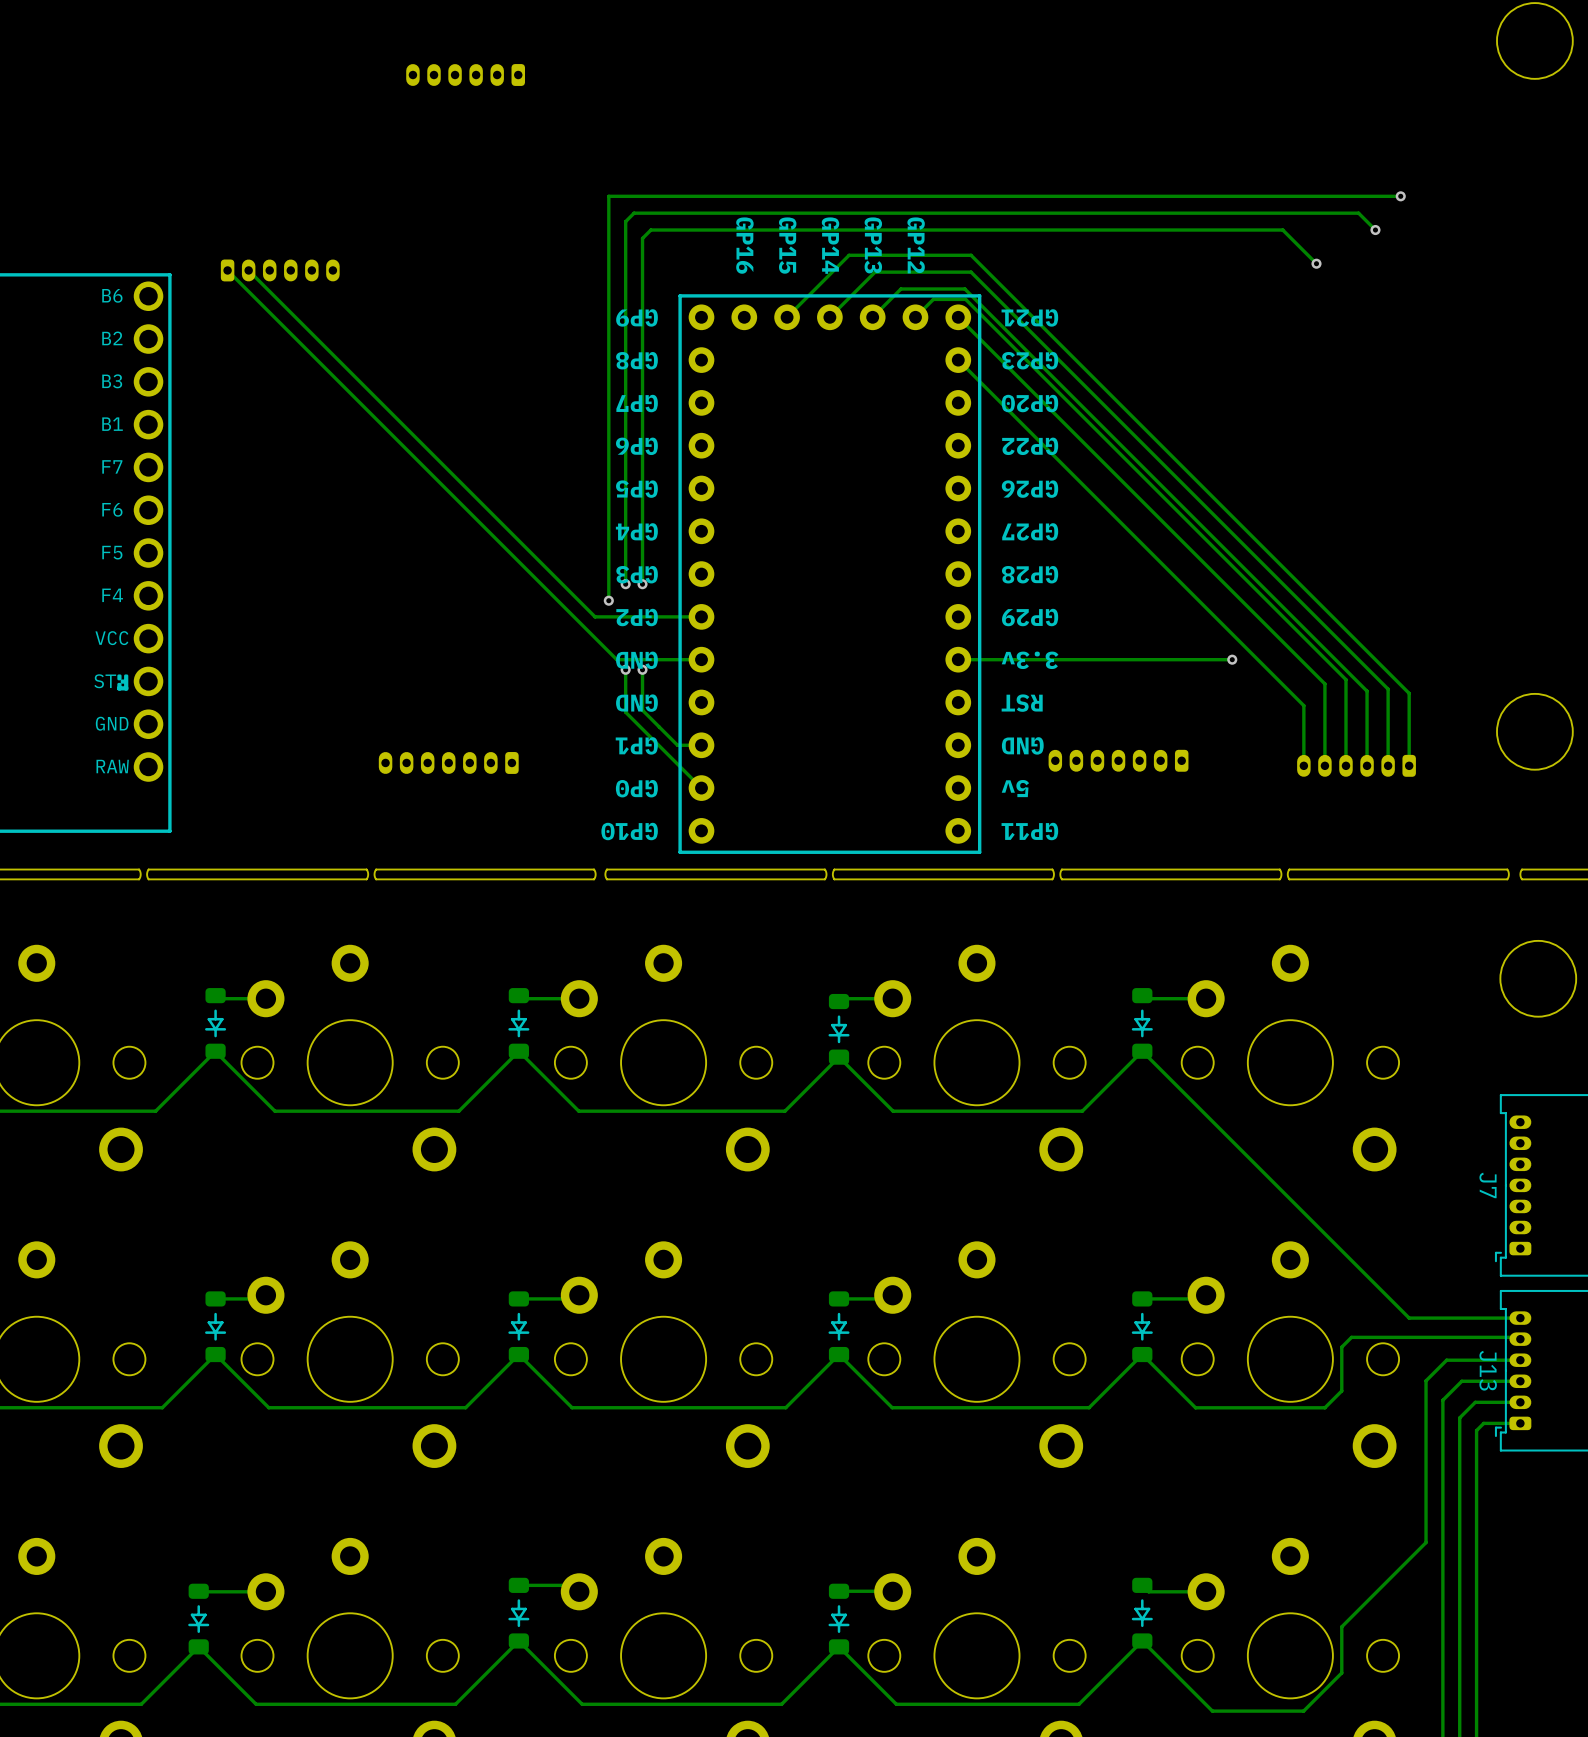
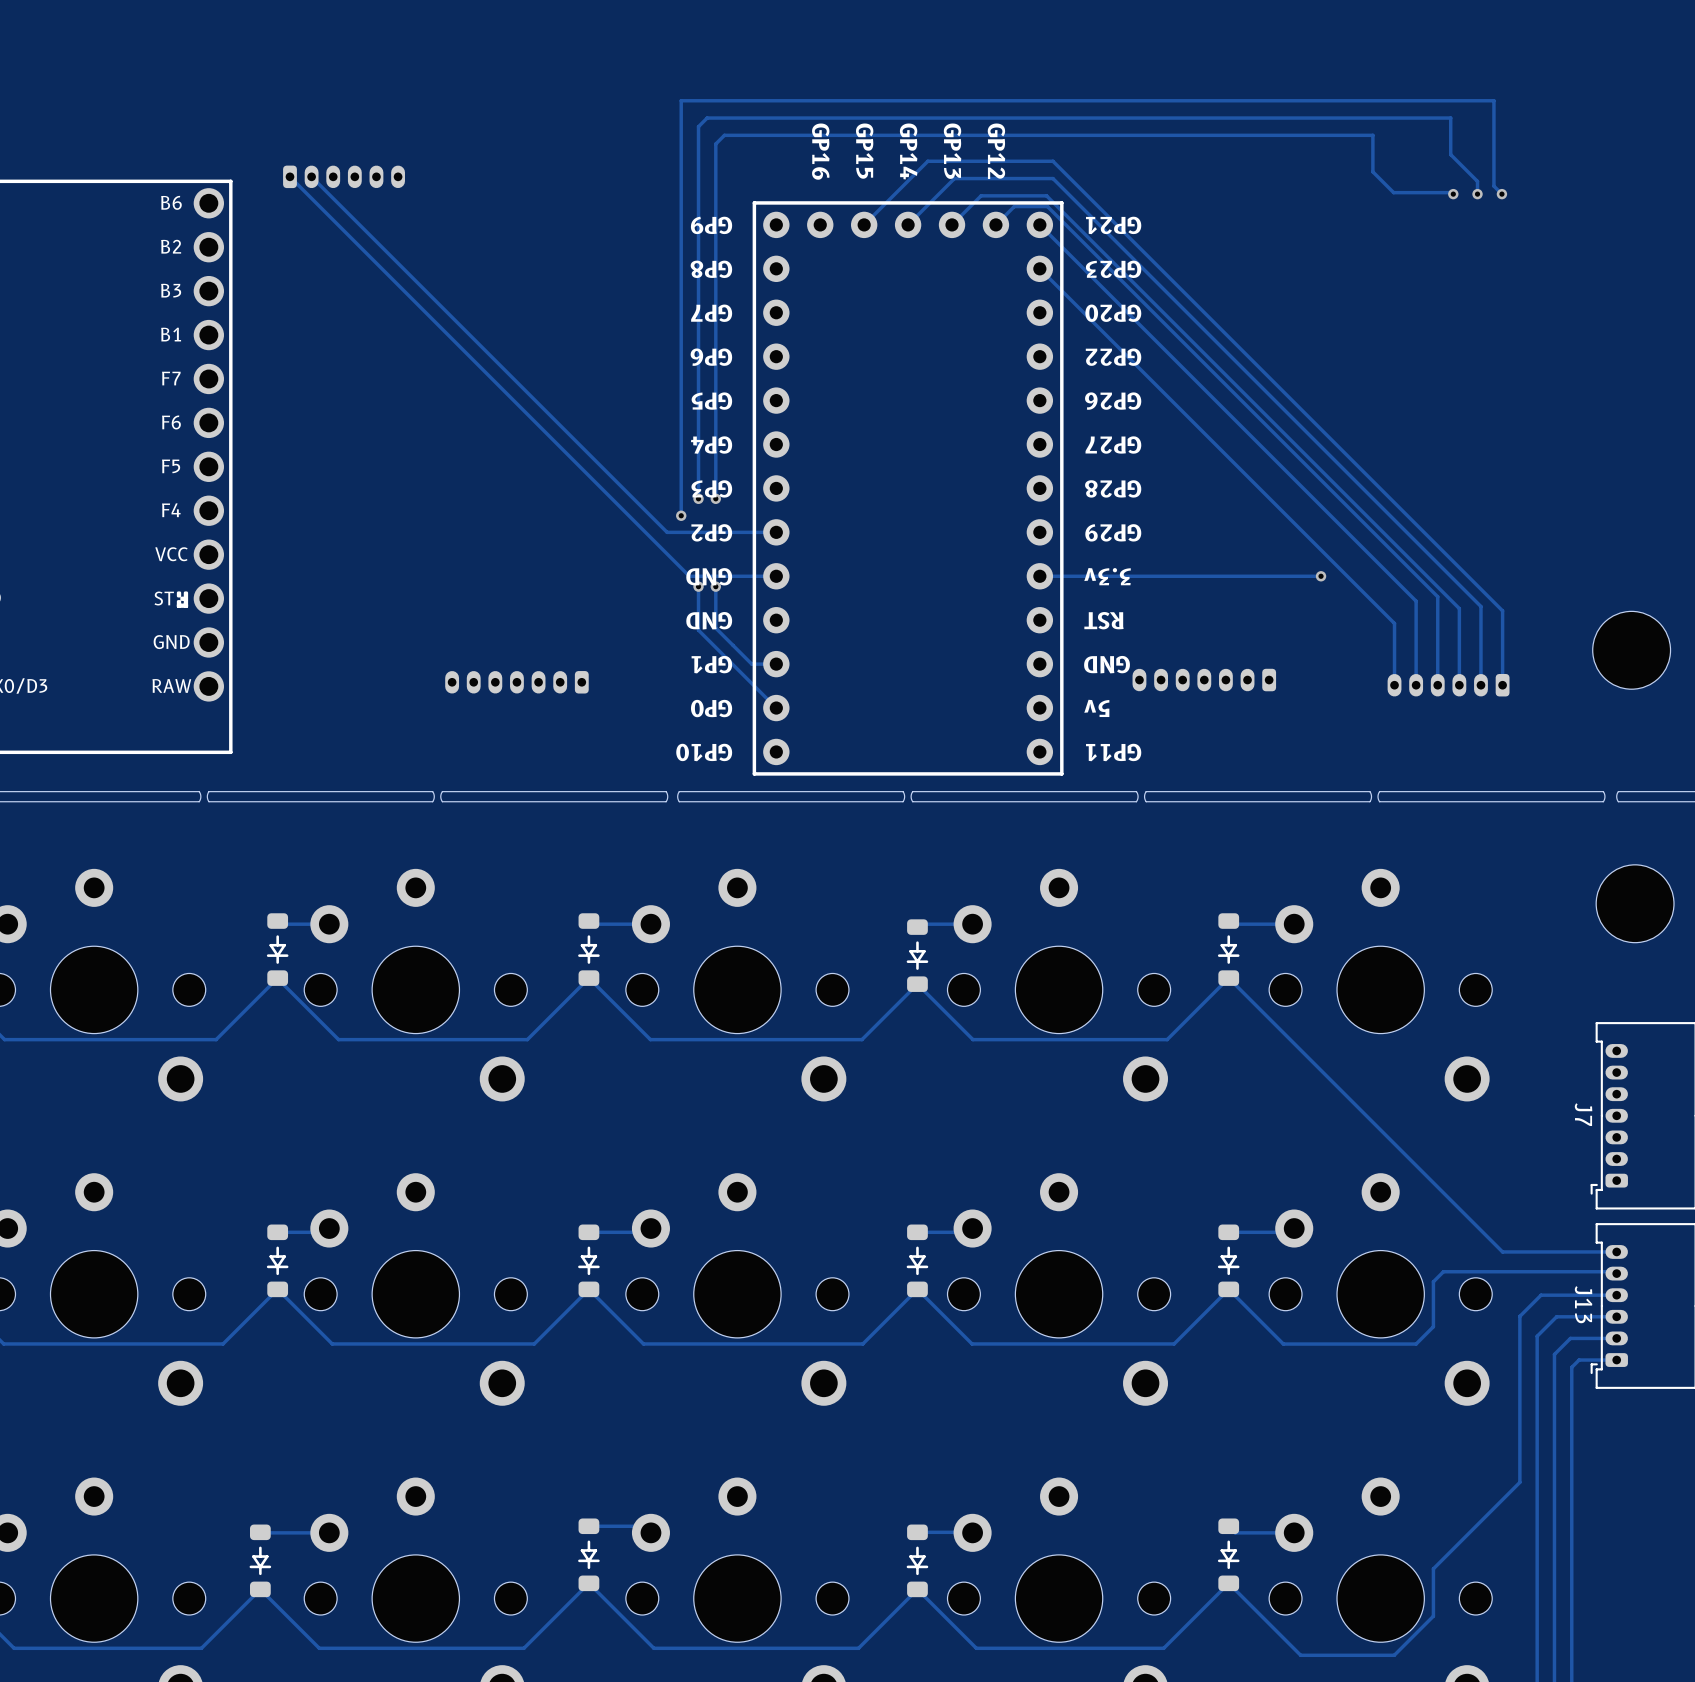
track: none -> (1493, 100) (1493, 186) (1501, 194)
via: (1400, 196) -> none
track: (1358, 213) (1375, 230) -> (1450, 118) (1450, 154) (1477, 181) (1477, 194)
track: (1282, 230) (1316, 263) -> (1372, 135) (1372, 171) (1393, 192) (1453, 194)
via: (1375, 230) -> none
via: (1316, 263) -> none
via: none -> (1453, 194)
via: none -> (1477, 194)
via: none -> (1501, 194)

